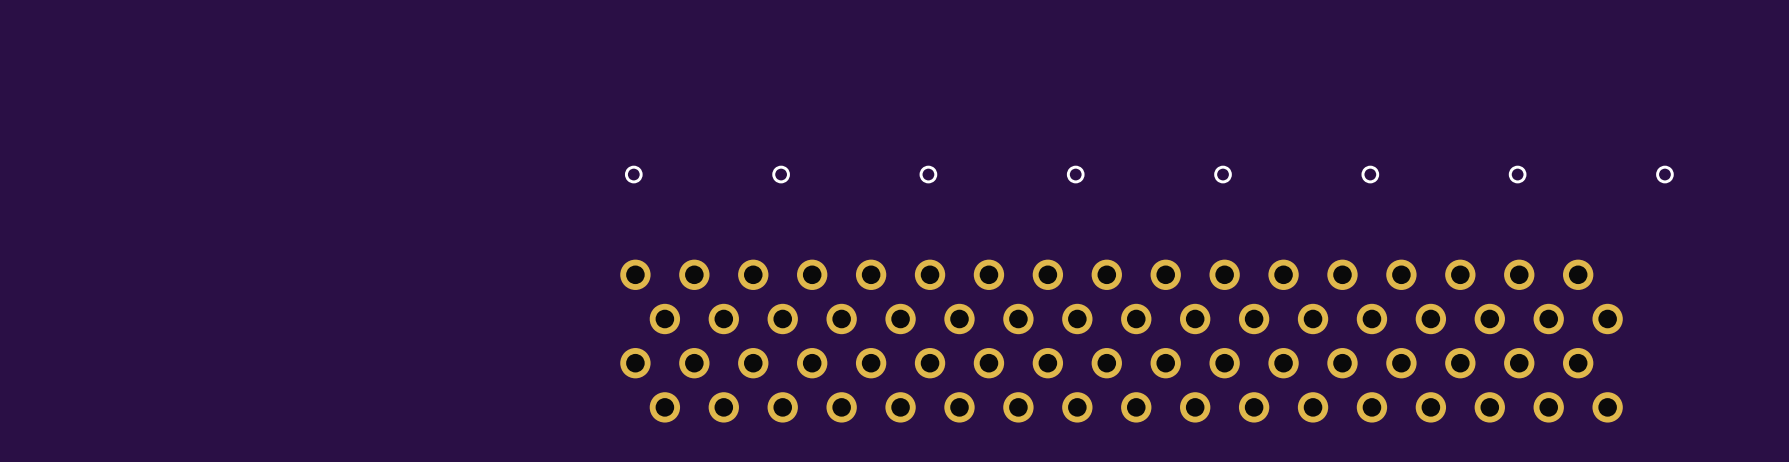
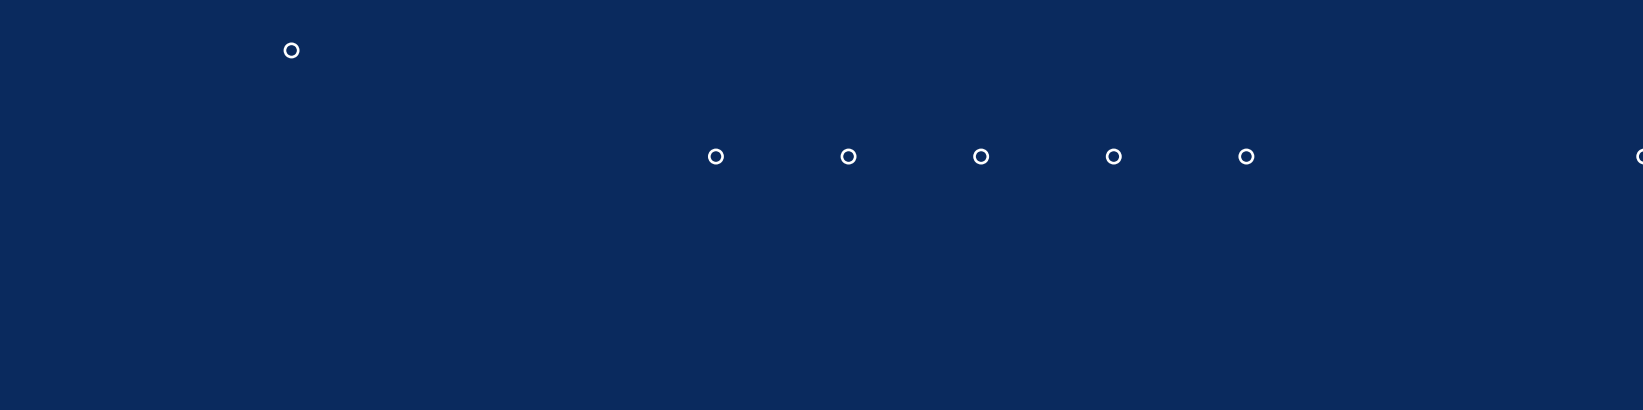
part position: (633, 174) -> (291, 50)
part: (1517, 174) -> none
part: (1664, 174) -> none
part: (1121, 341) -> none

